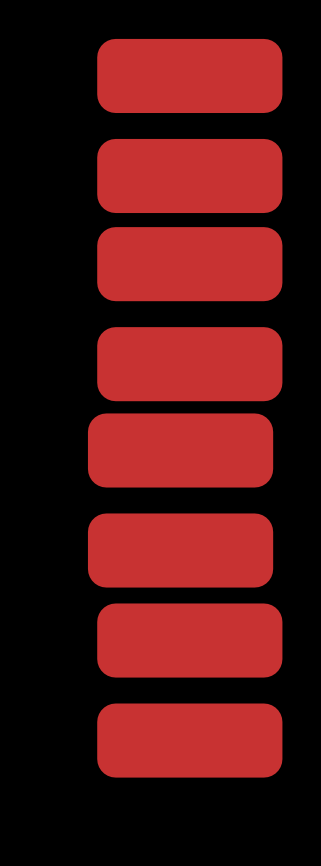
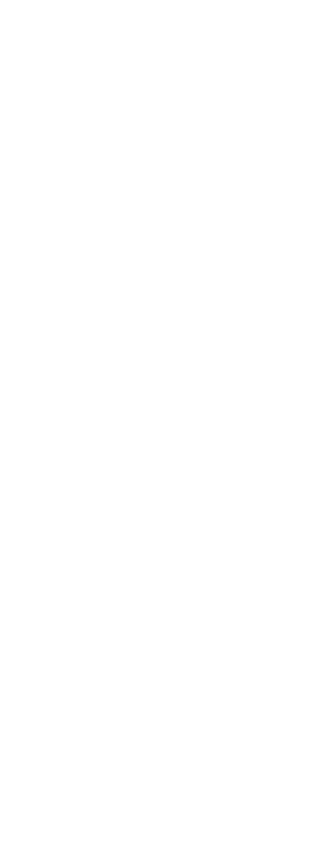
part: (189, 125) -> none
part: (189, 314) -> none
part: (180, 500) -> none
part: (189, 690) -> none

